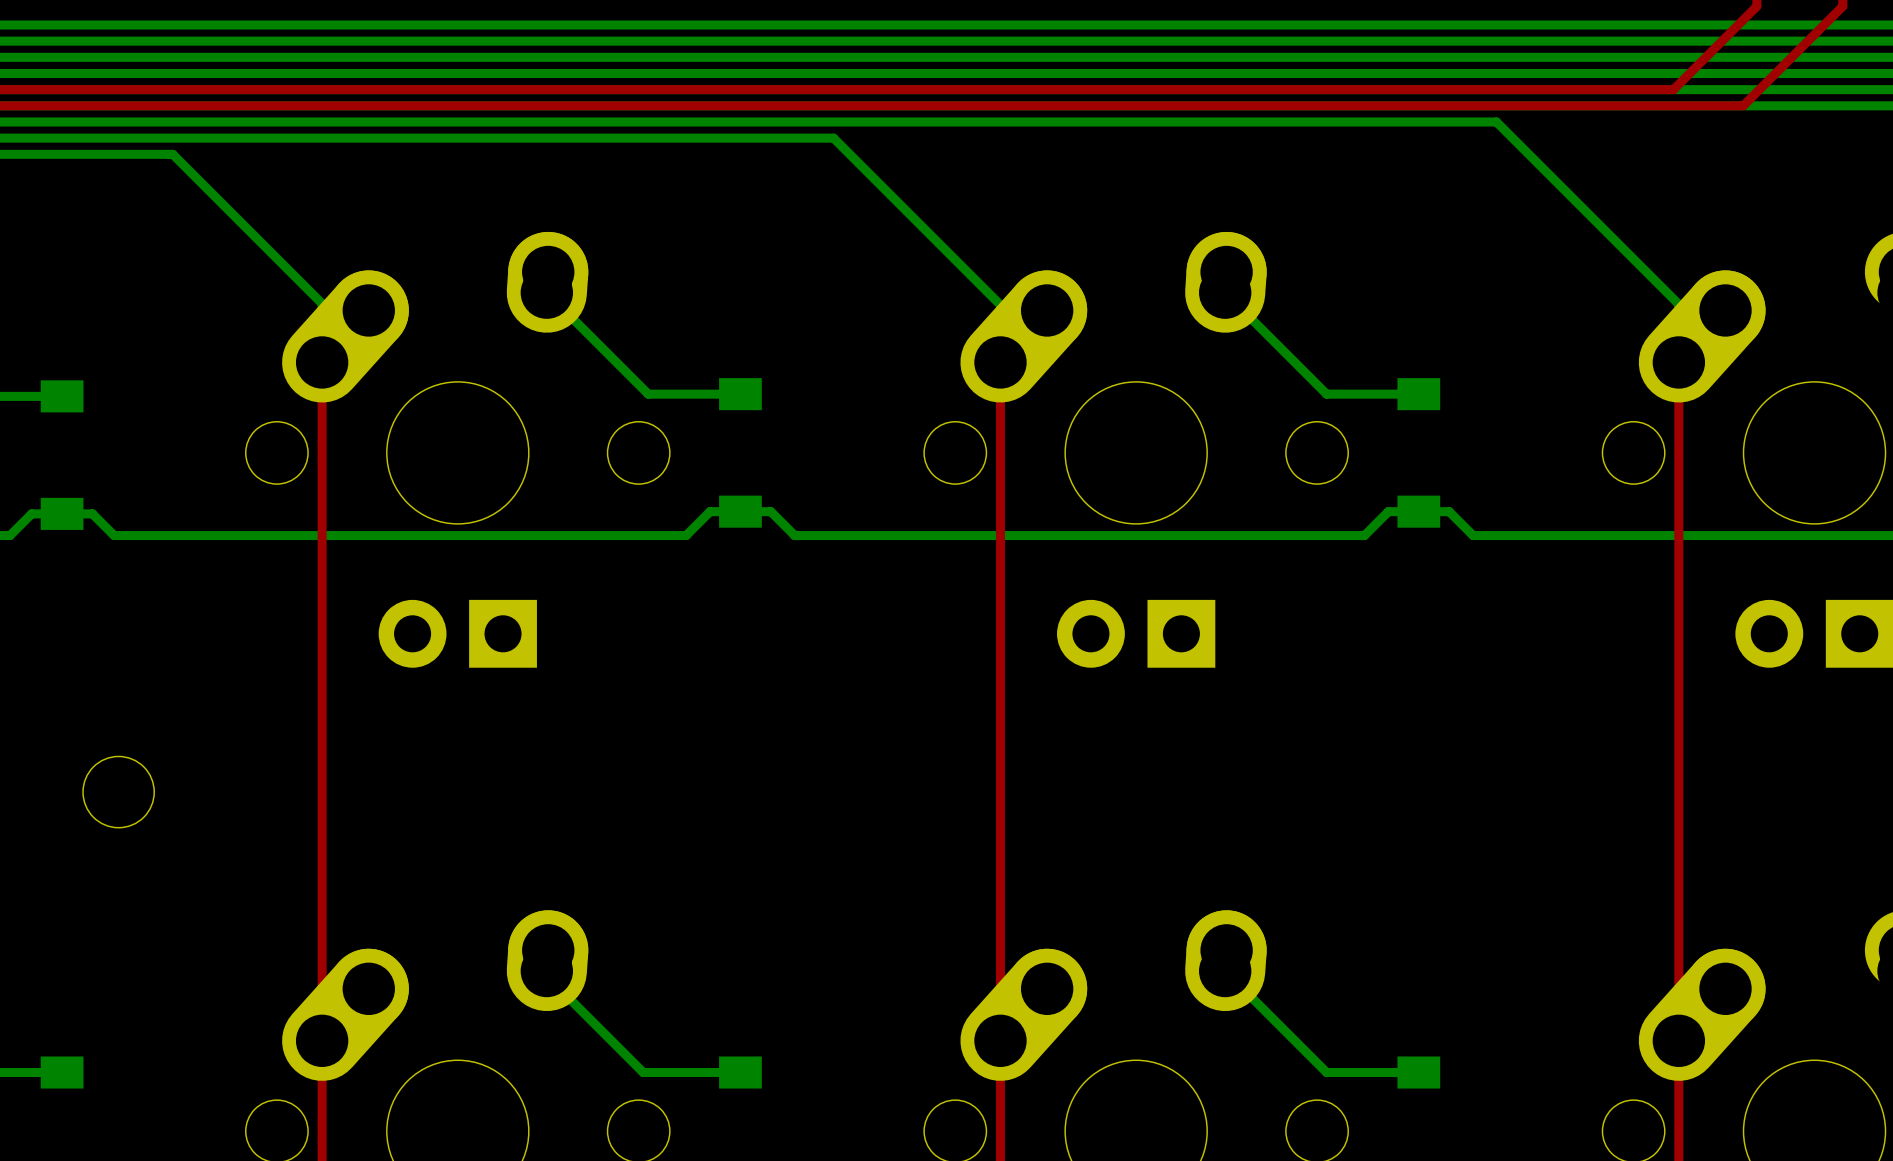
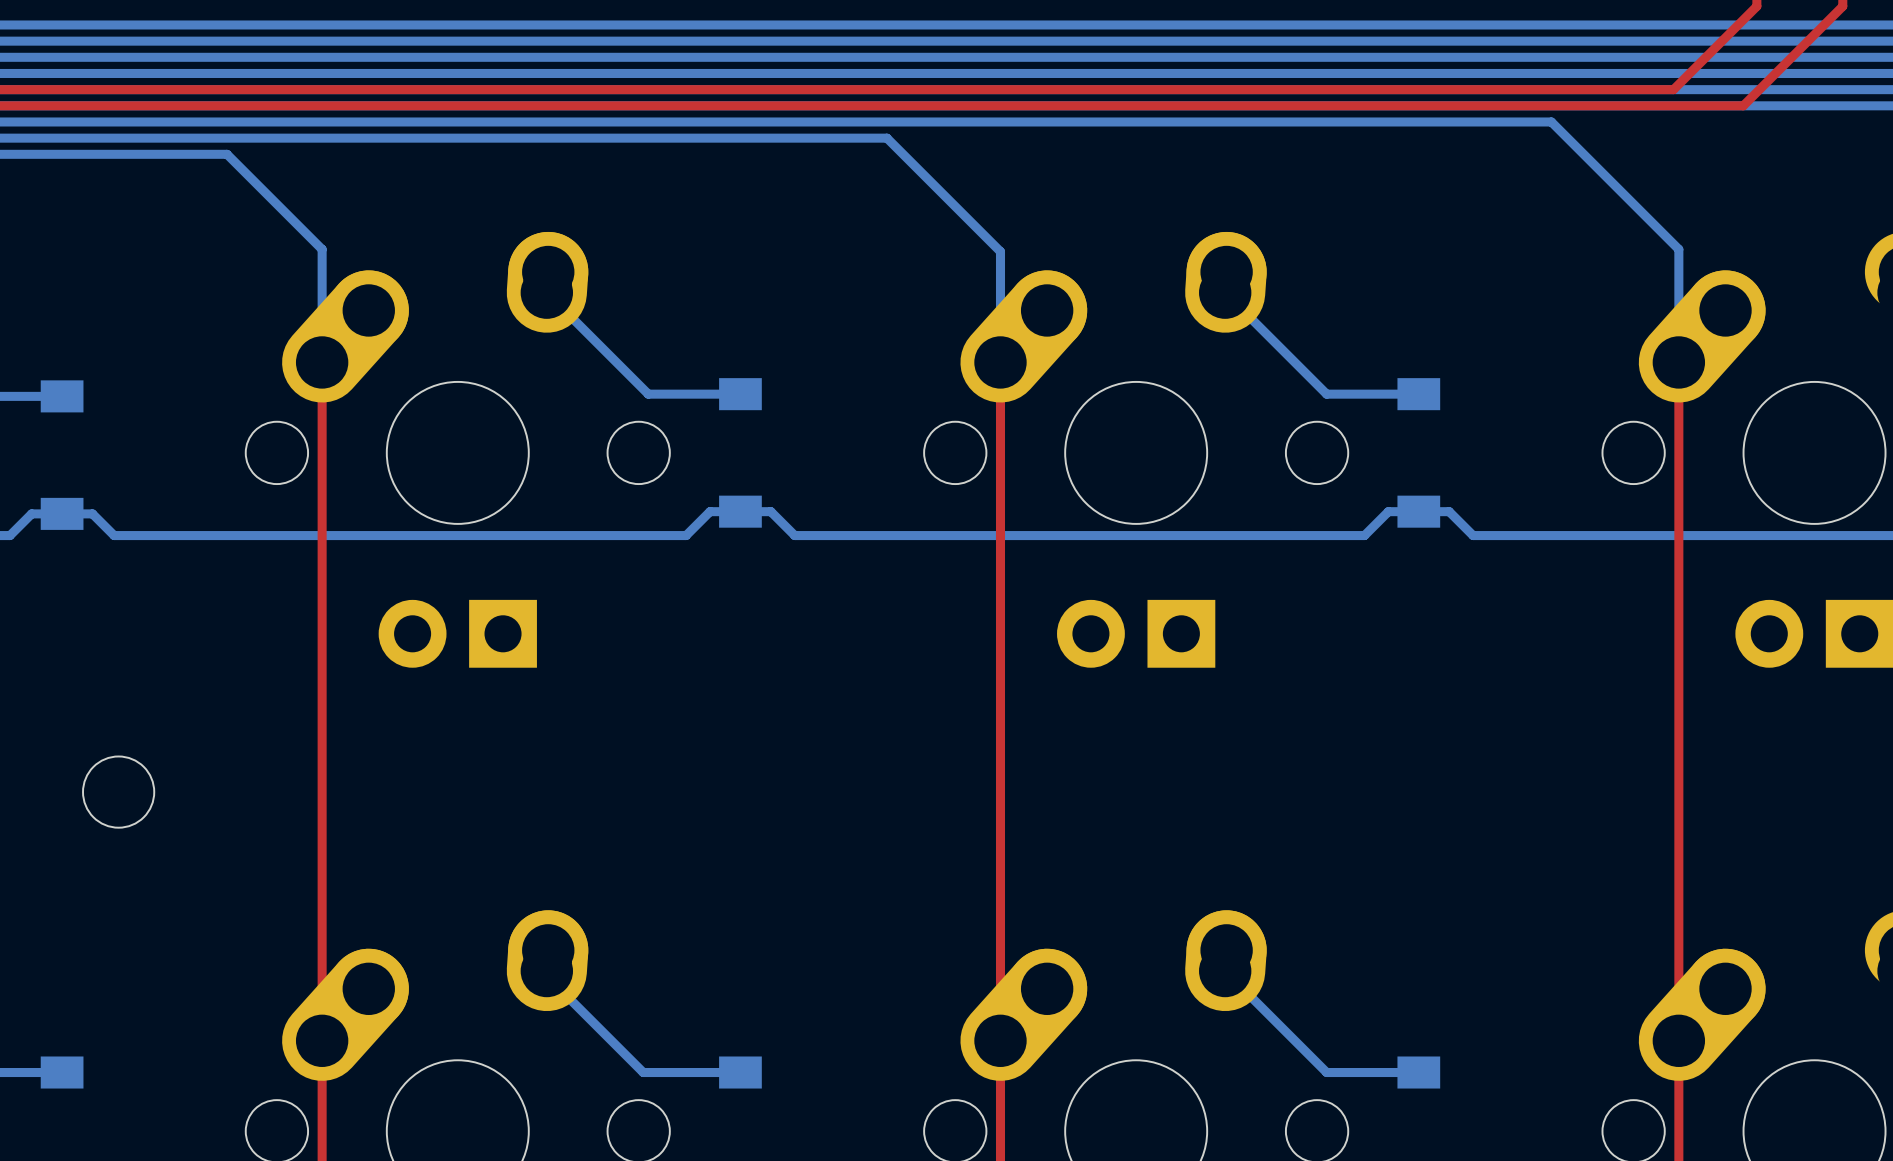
bottom track: (1496, 121) (1678, 304) -> (1496, 121) (1551, 121) (1678, 249) (1678, 304)
bottom track: (833, 138) (1000, 305) -> (833, 138) (886, 138) (1000, 251) (1000, 305)
bottom track: (172, 154) (322, 303) -> (172, 154) (227, 154) (322, 249) (322, 303)

